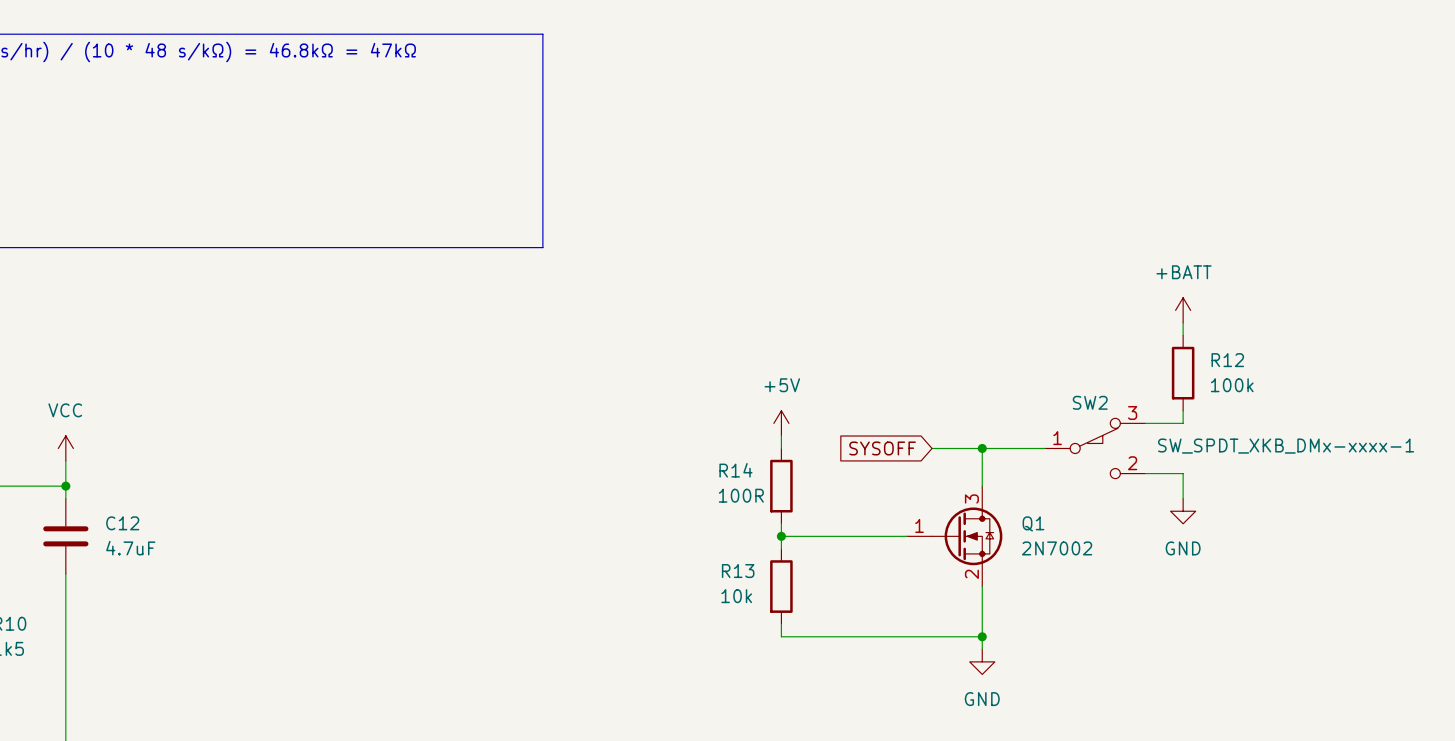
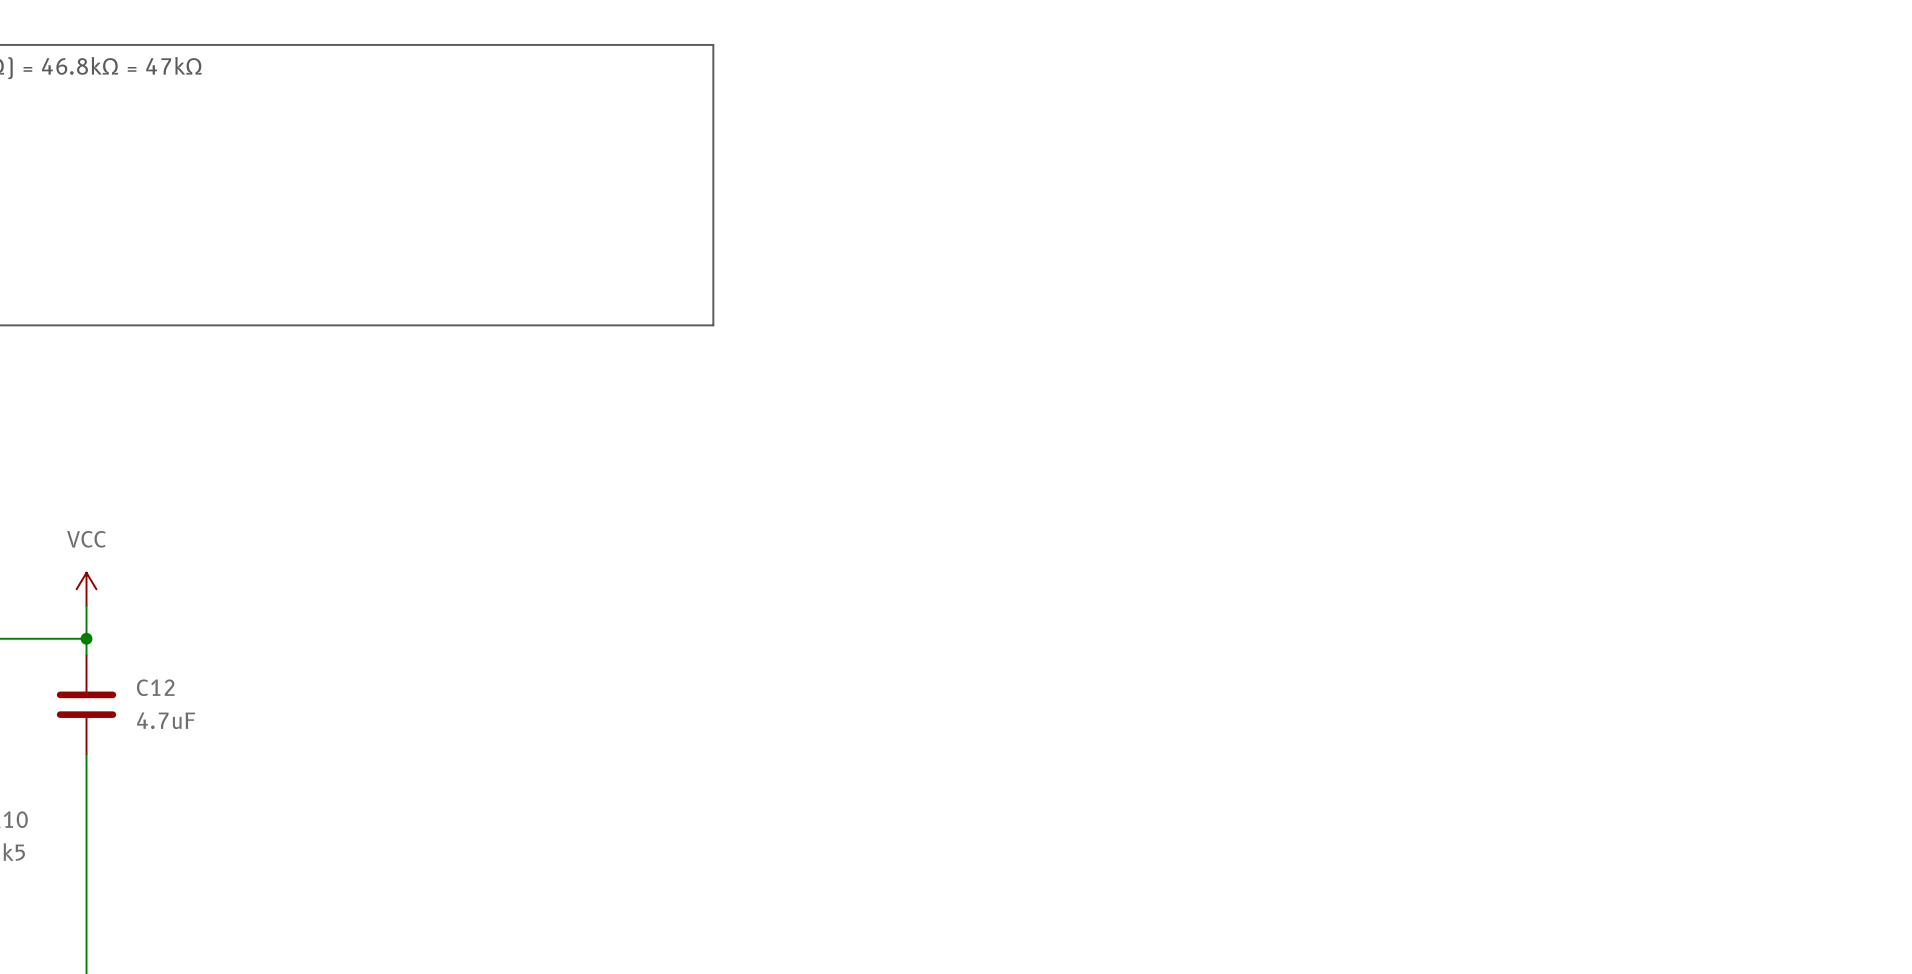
power symbol: +BATT (1183, 310) -> none
wire: (1183, 322) (1183, 335) -> none
R12: 100k (1183, 373) -> none
wire: (1183, 410) (1183, 423) (1145, 423) -> none
power symbol: +5V (781, 423) -> none
wire: (781, 435) (781, 448) -> none
global label: SYSOFF (882, 448) -> none
wire: (932, 448) (1045, 448) -> none
wire: (982, 448) (982, 486) -> none
junction: (982, 448) -> none
SW2: SW_SPDT_XKB_DMx-xxxx-1 (1095, 448) -> none
wire: (1145, 473) (1183, 473) (1183, 498) -> none
R14: 100R (781, 486) -> none
power symbol: GND (1183, 511) -> none
wire: (781, 523) (781, 548) -> none
wire: (781, 536) (906, 536) -> none
junction: (781, 536) -> none
Q1: 2N7002 (954, 536) -> none
R13: 10k (781, 586) -> none
wire: (982, 586) (982, 649) -> none
wire: (781, 624) (781, 636) (982, 636) -> none
junction: (982, 636) -> none
power symbol: GND (982, 661) -> none

